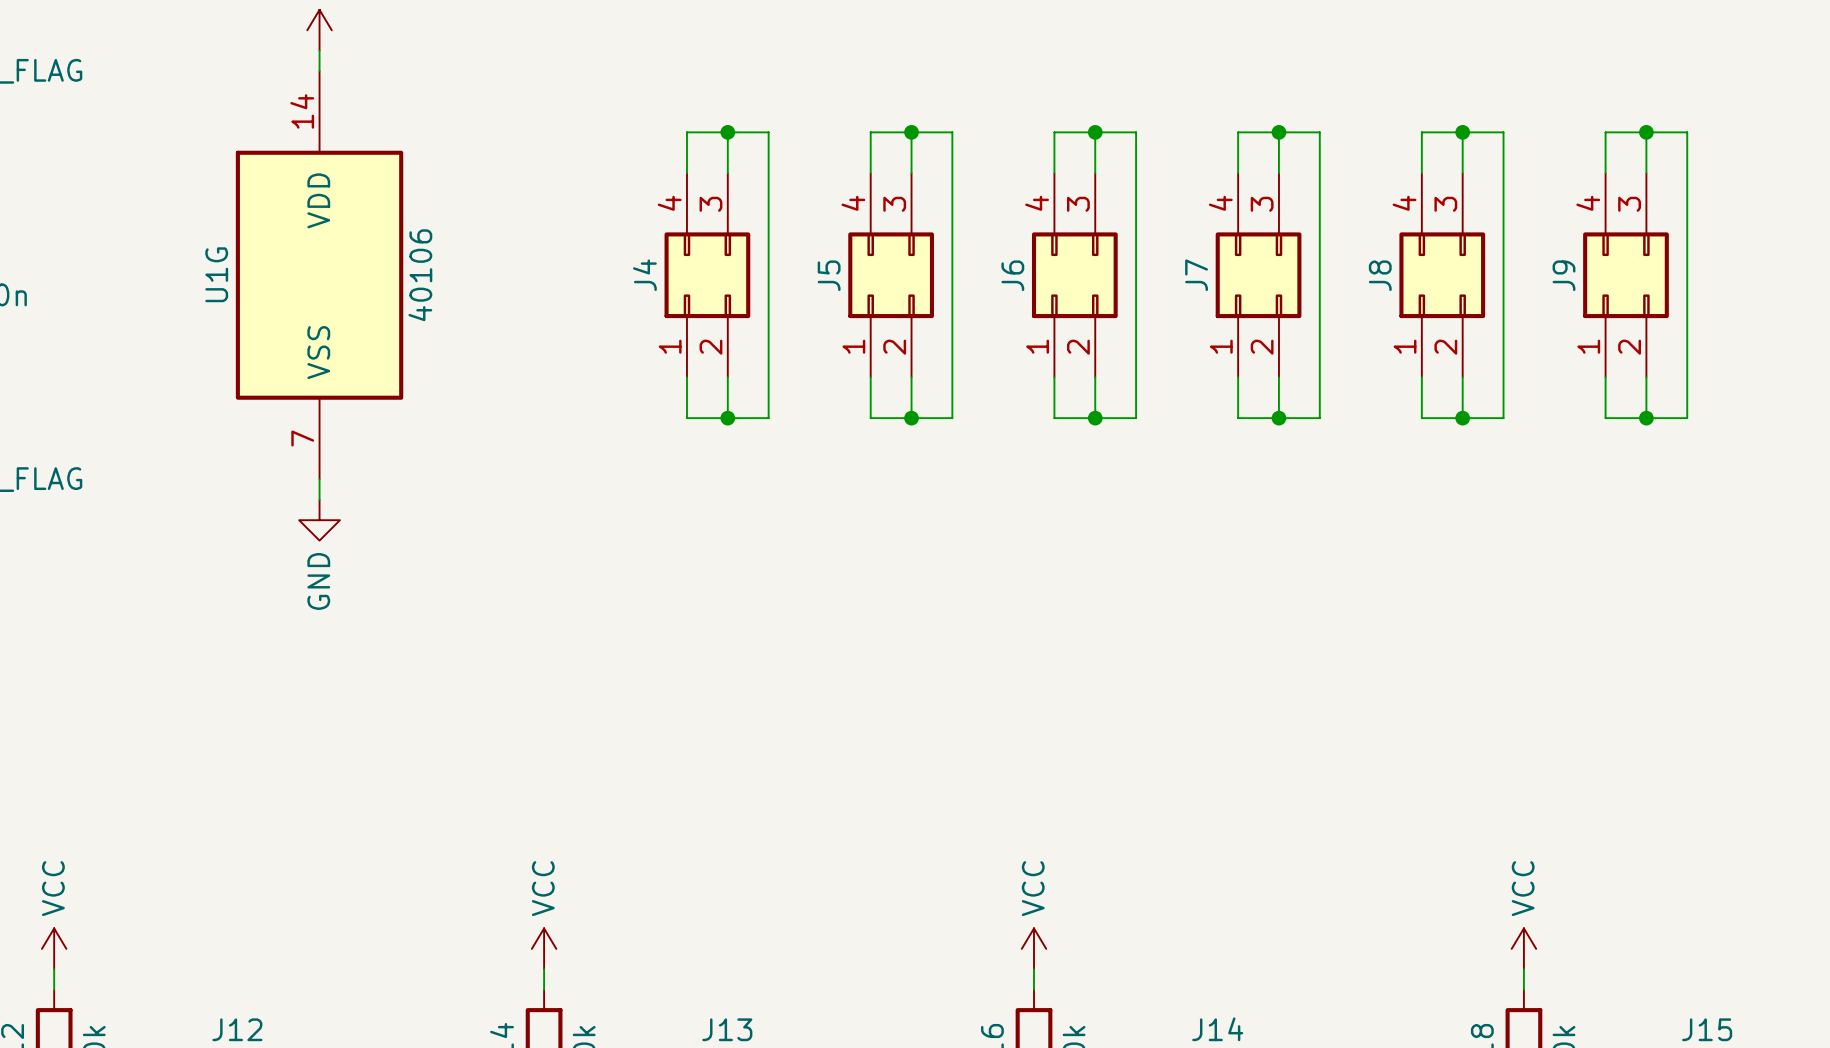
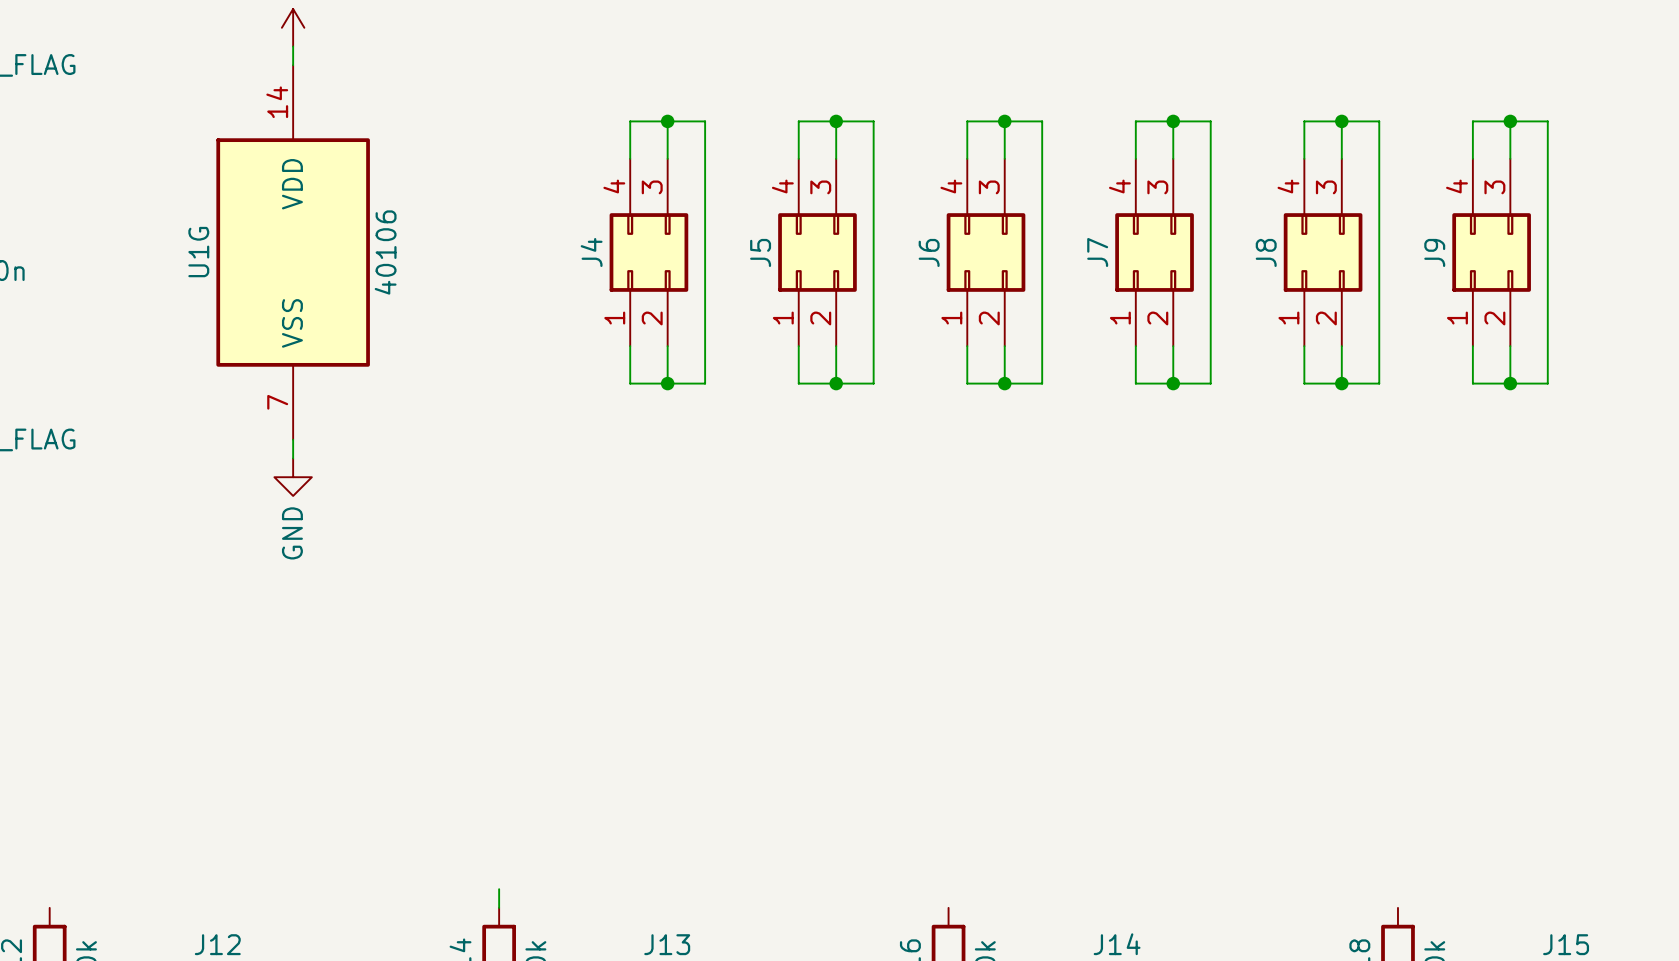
power symbol: VCC (54, 948) -> none
power symbol: VCC (544, 948) -> none
power symbol: VCC (1034, 948) -> none
power symbol: VCC (1523, 948) -> none
wire: (54, 969) (54, 989) -> none
wire: (1034, 969) (1034, 989) -> none
wire: (1523, 969) (1523, 989) -> none

